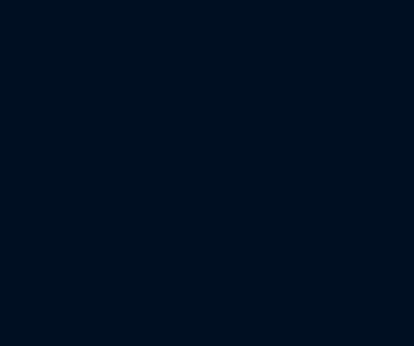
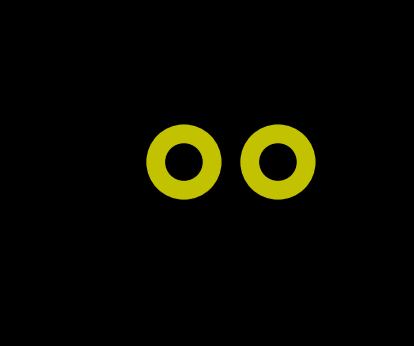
part: none -> (230, 162)

